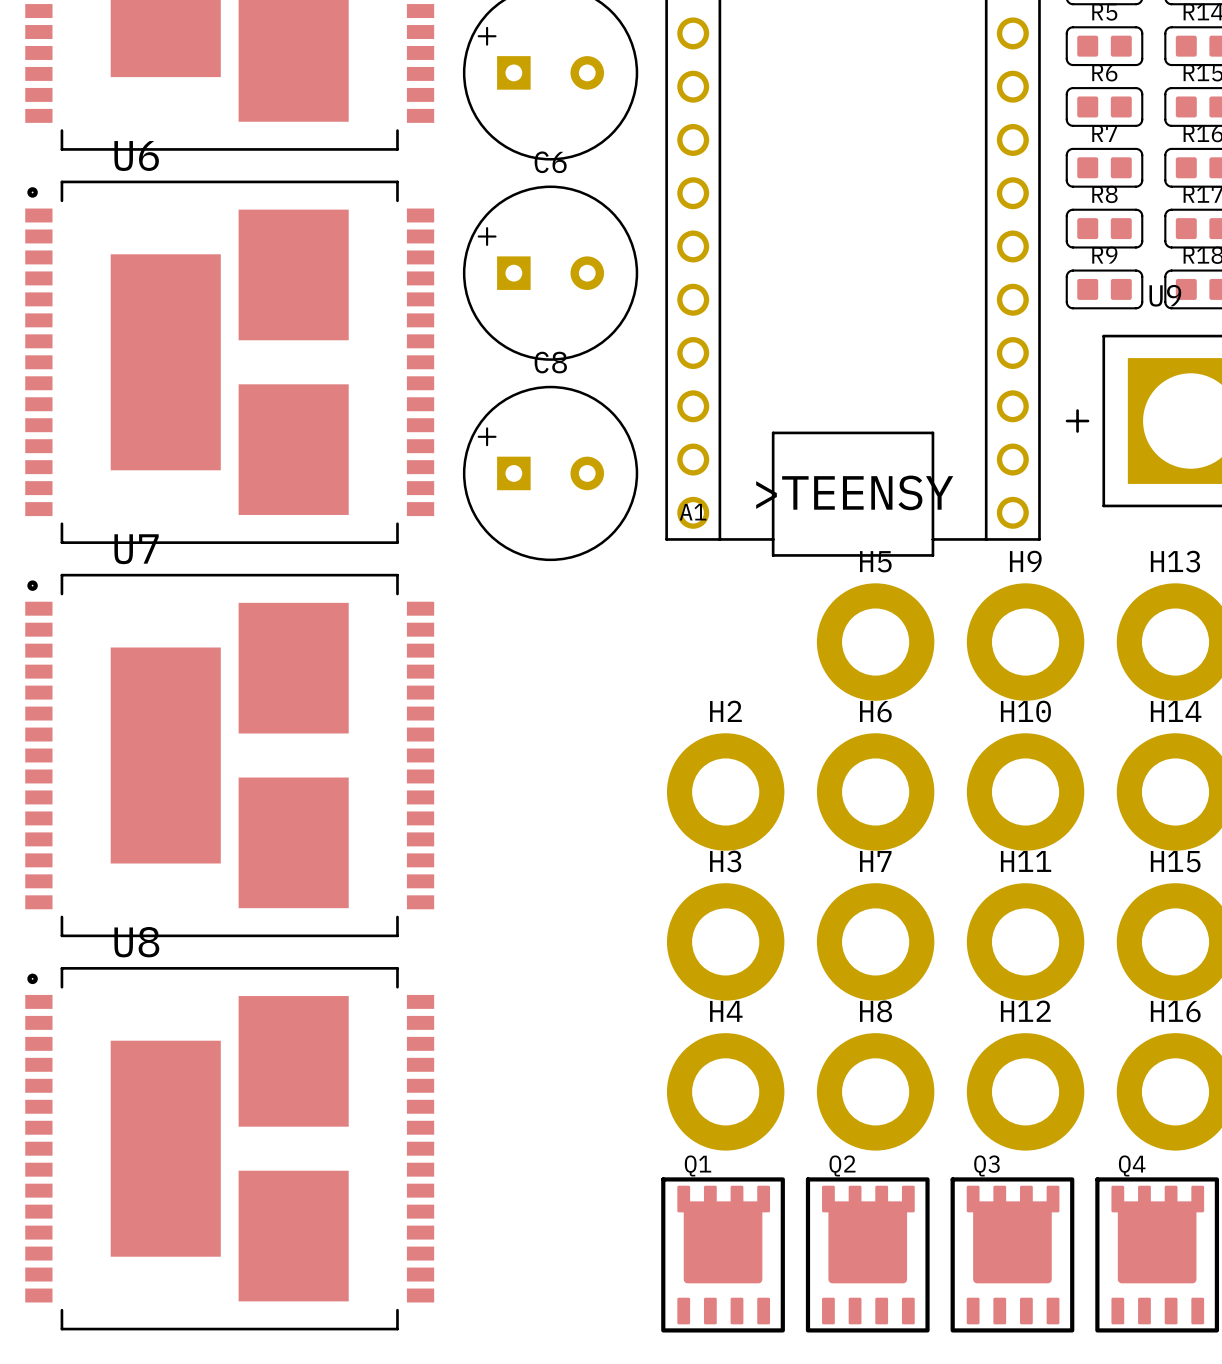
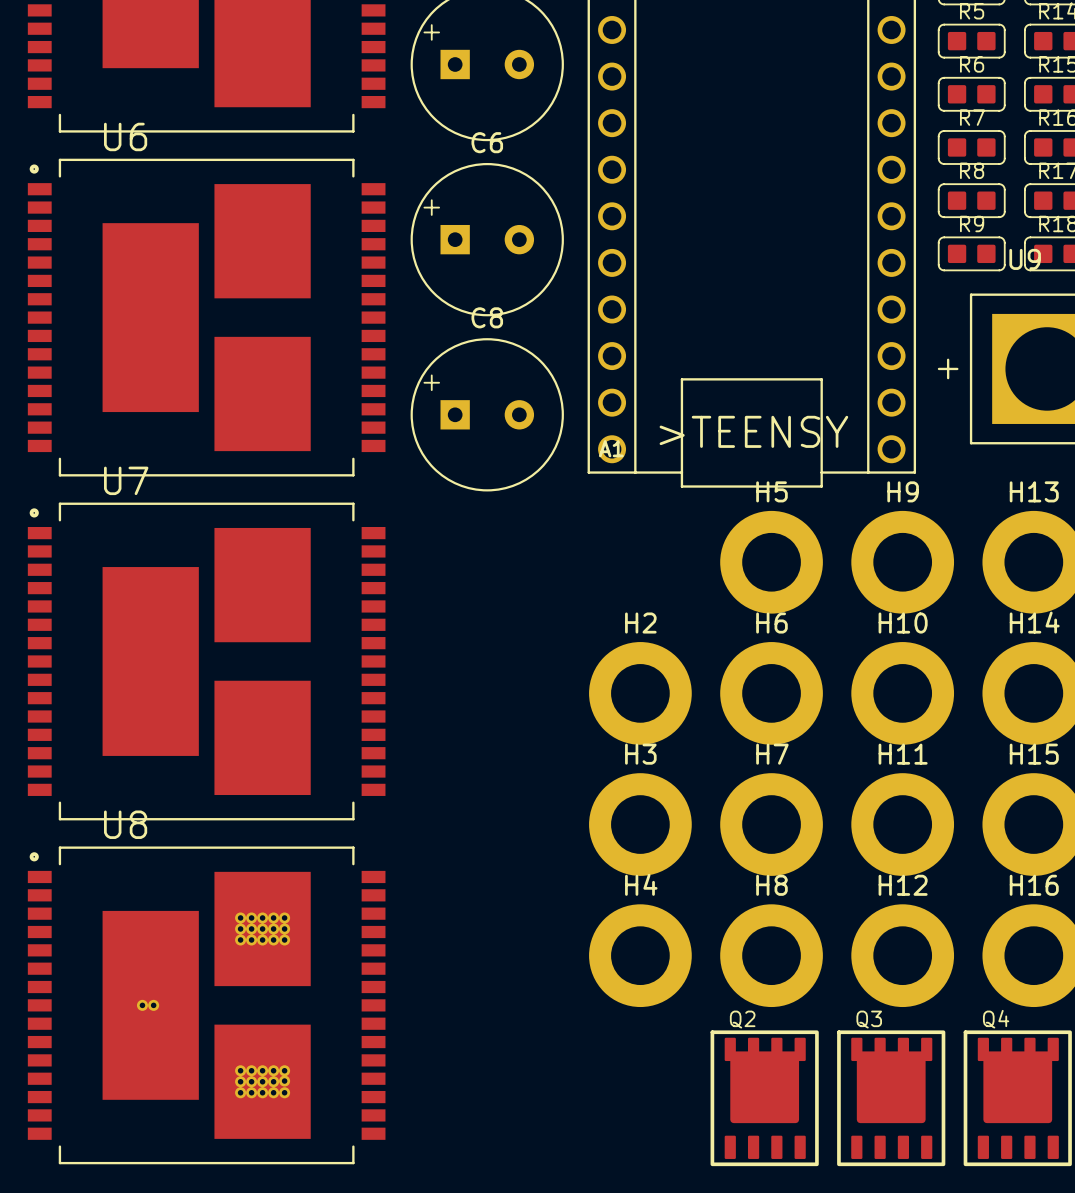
U8 footprint: [25, 967, 435, 1331] -> [27, 846, 386, 1165]
Q1: (723, 1254) -> none

